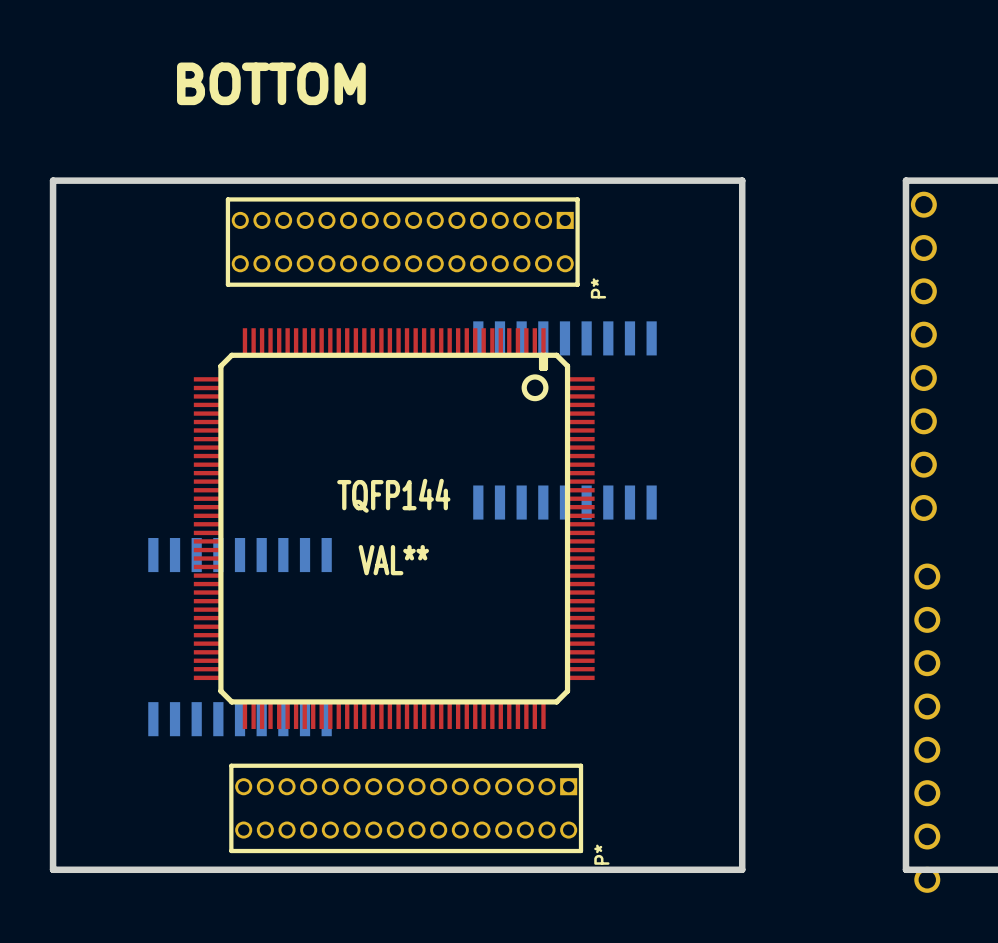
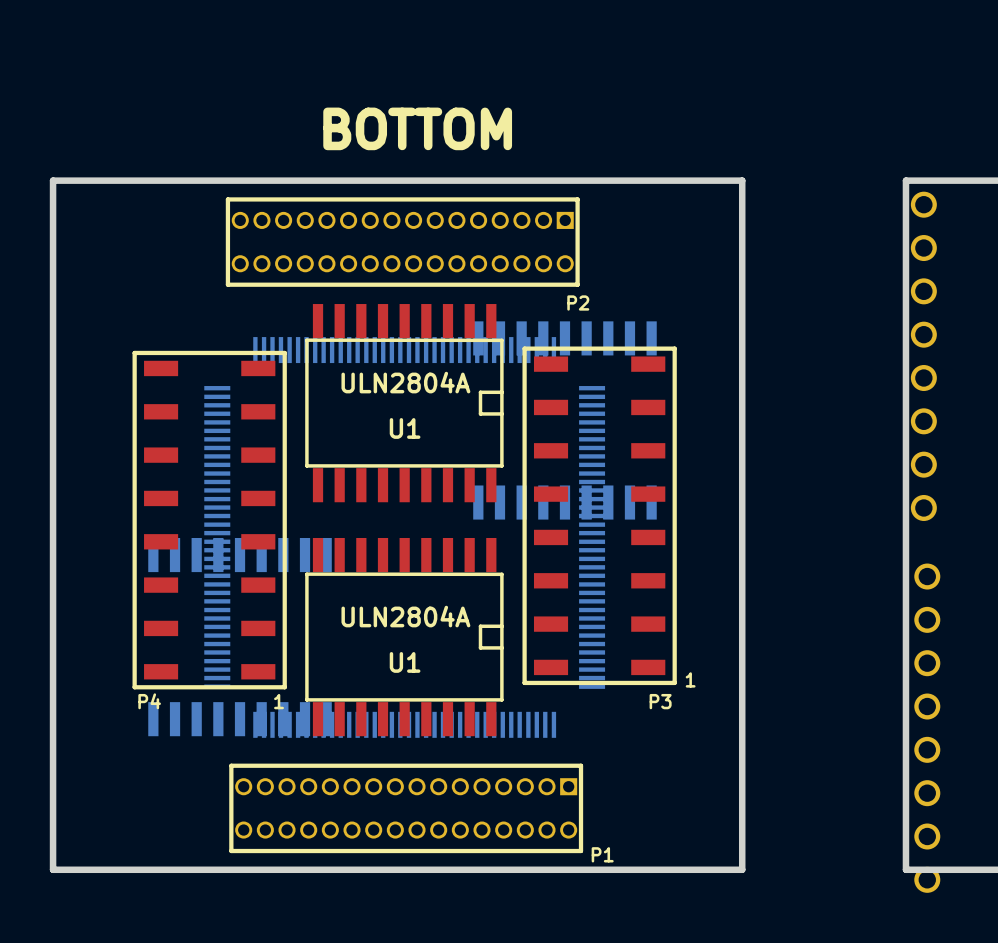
text position: BOTTOM (271, 83) -> BOTTOM (417, 128)
part value: P* (598, 288) -> P2 (578, 303)
U1: none -> ULN2804A (404, 403)
part: none -> P3 (599, 515)
part: none -> P4 (209, 520)
TQFP144 side: top (394, 528) -> bottom (404, 537)
U1: none -> ULN2804A (404, 637)
part value: P* (601, 854) -> P1 (602, 854)

